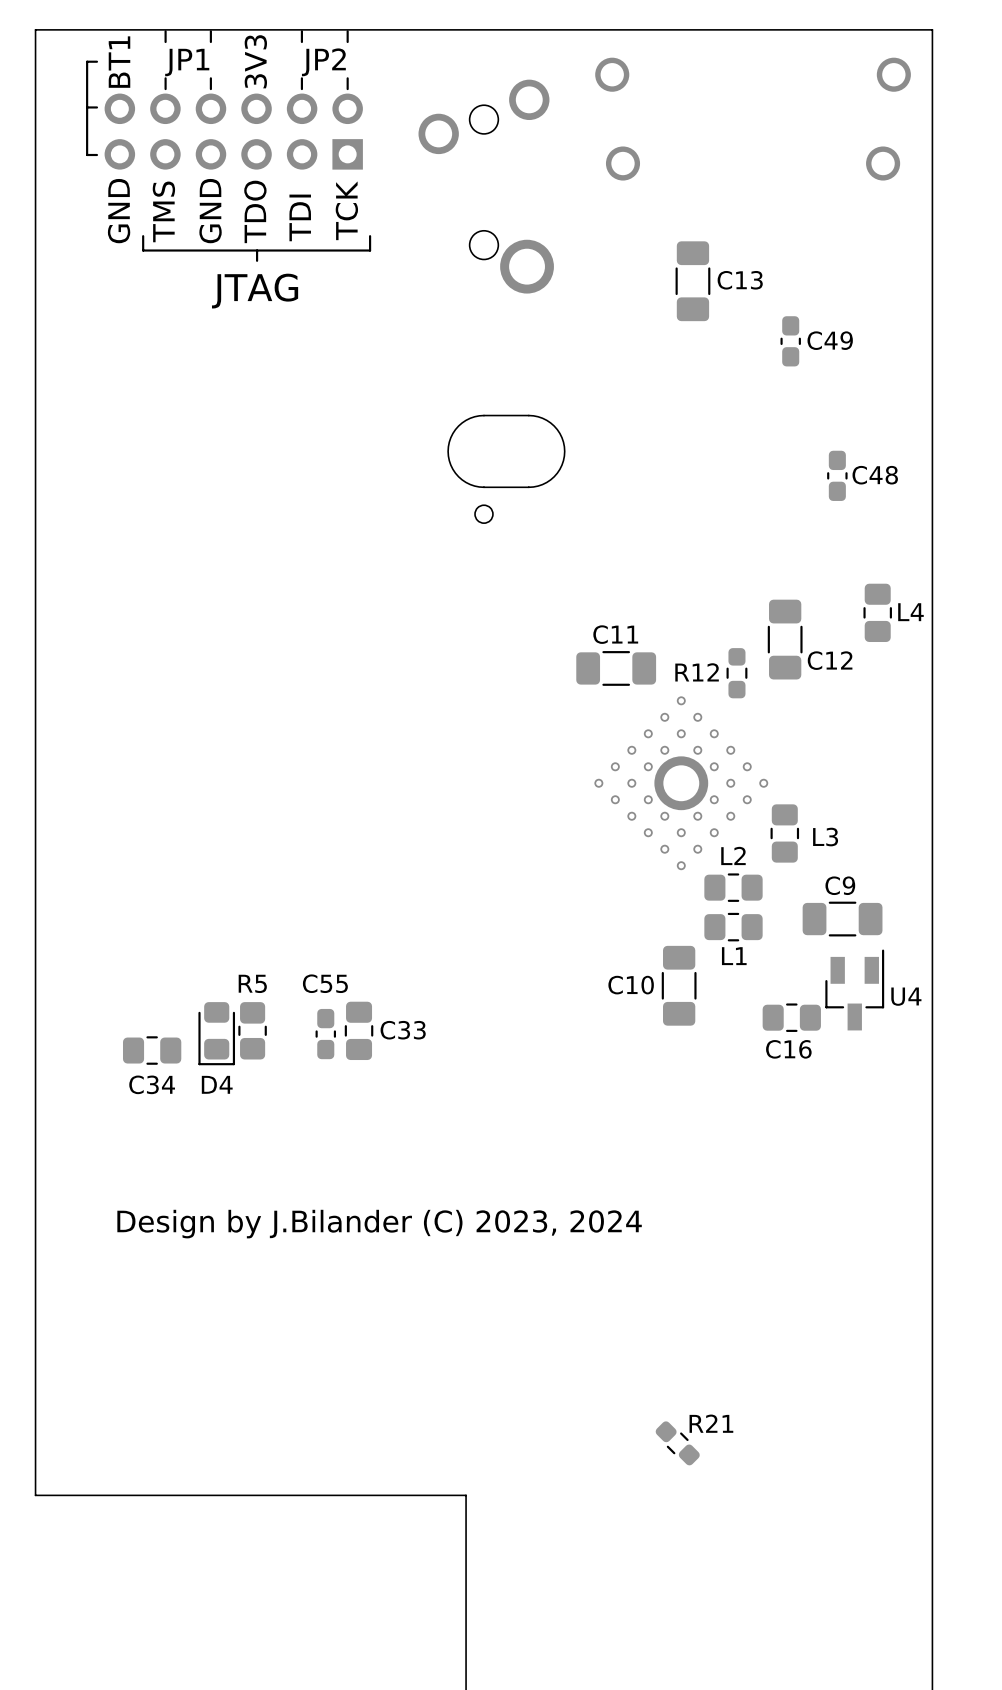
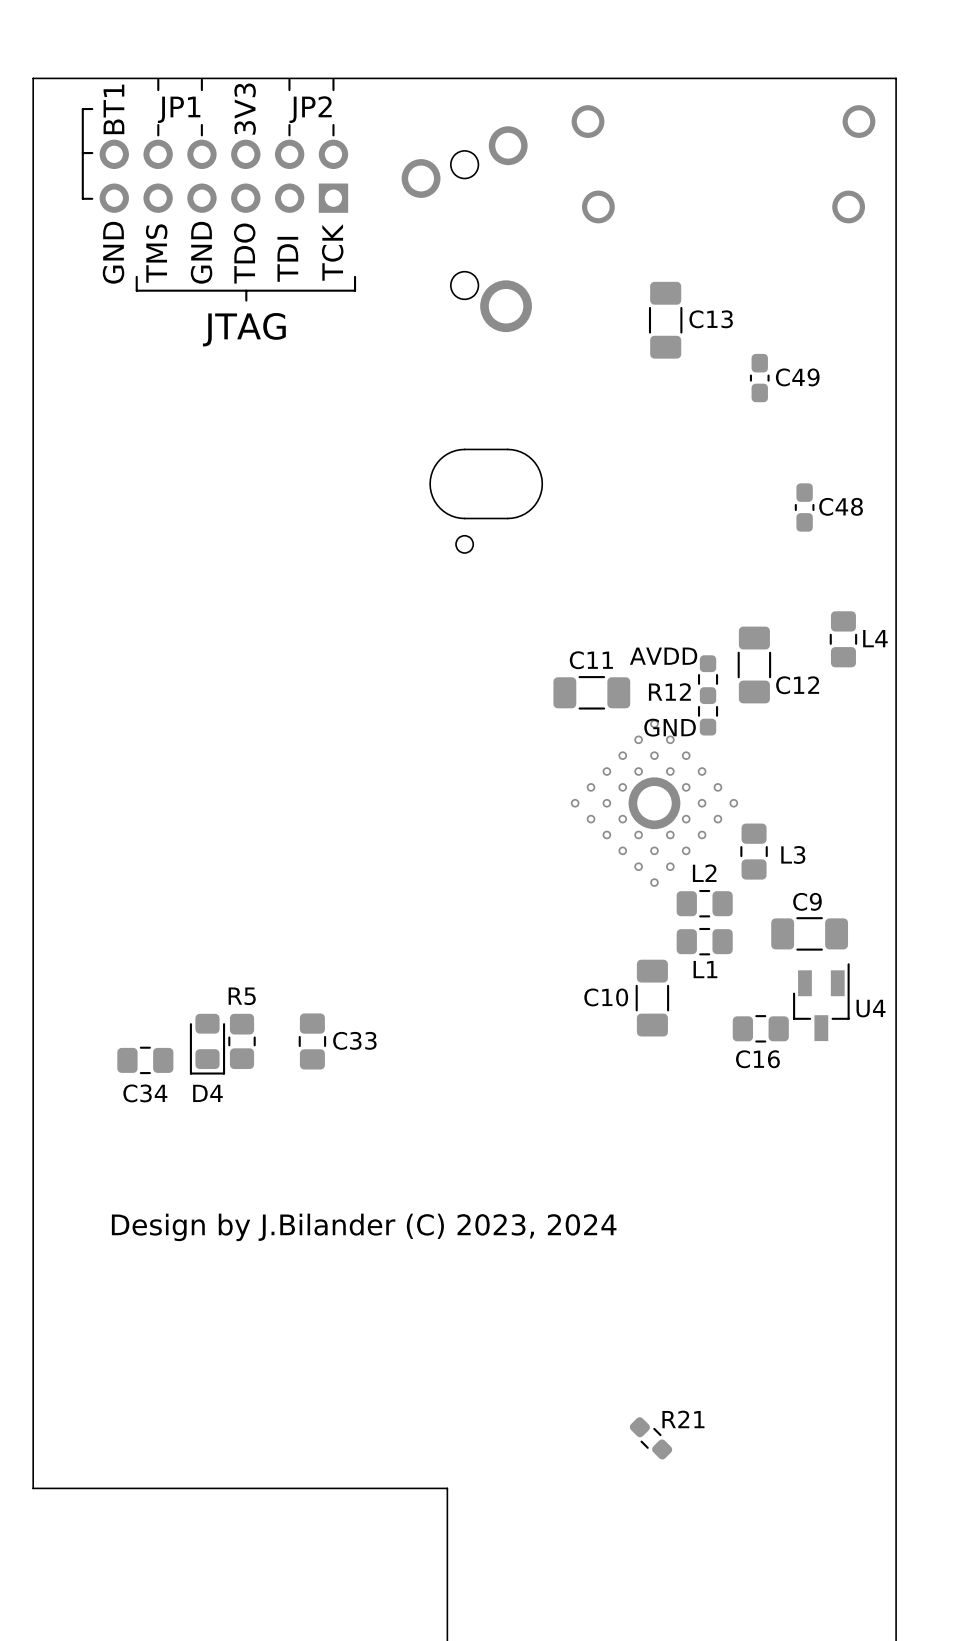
text: none -> AVDD (663, 656)
R12 footprint: [726, 648, 748, 699] -> [697, 655, 719, 736]
text: none -> GND (670, 727)
C33 position: (359, 1030) -> (312, 1041)
C55: (325, 1034) -> none

